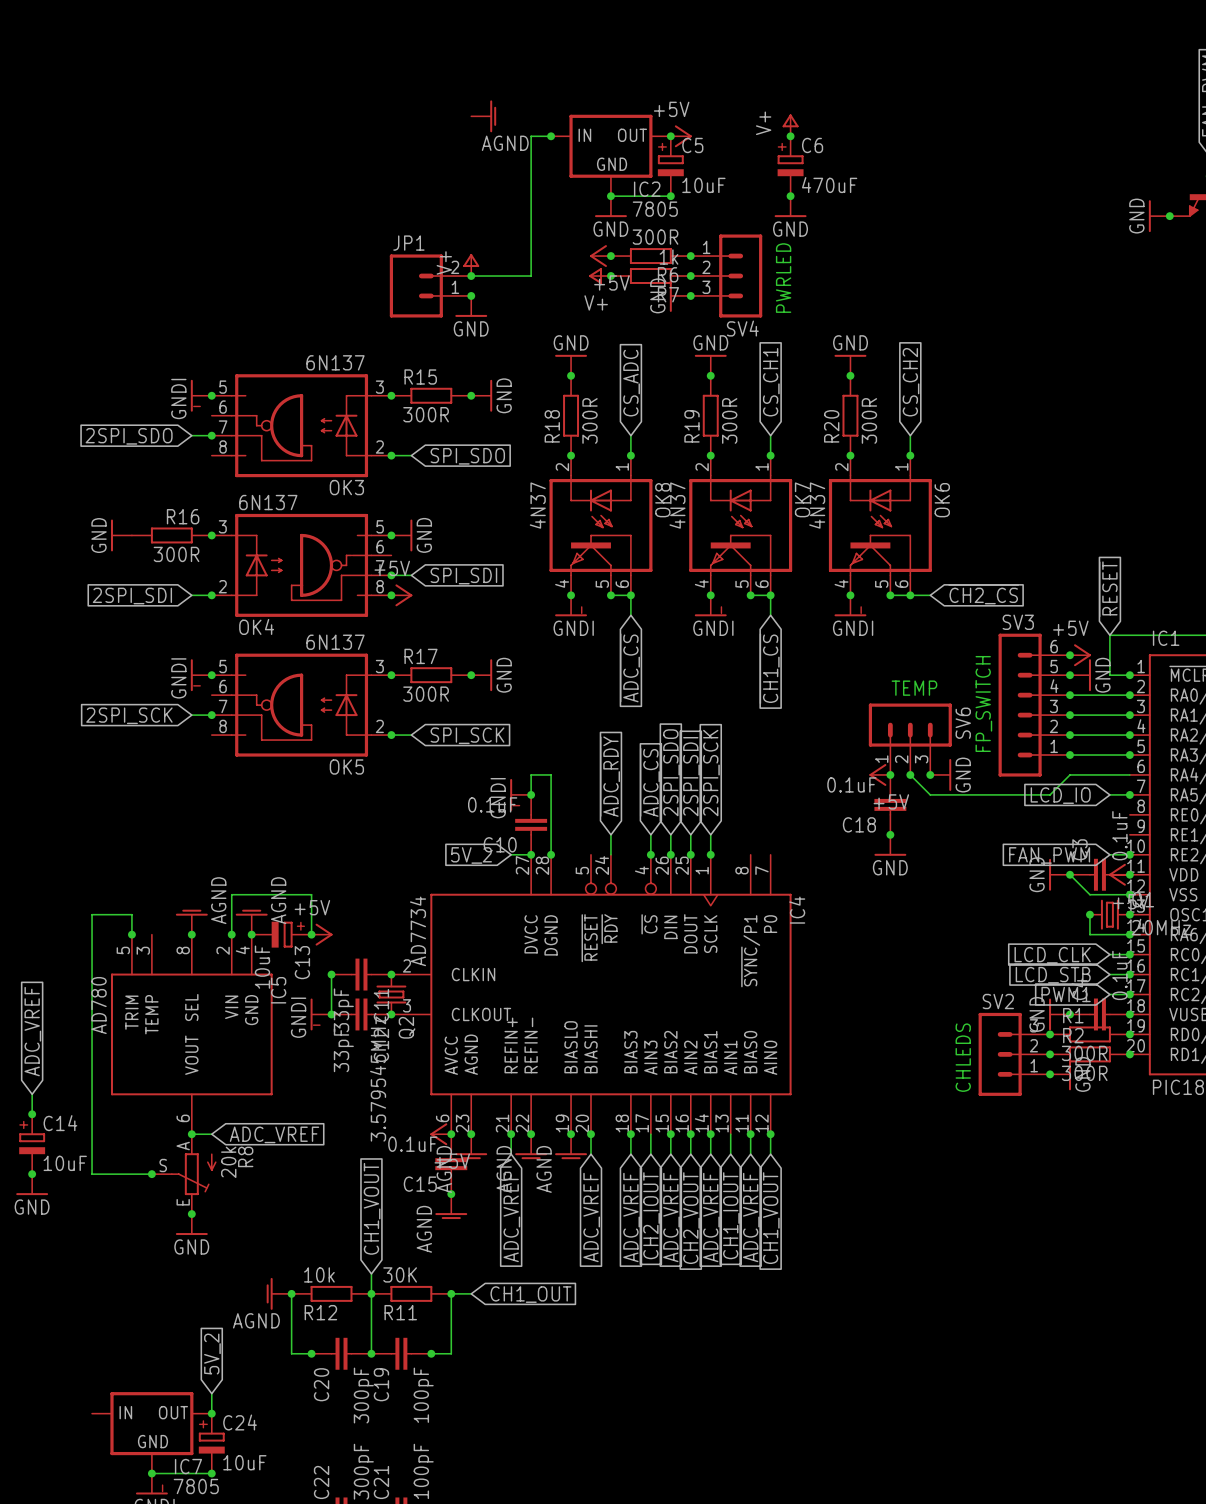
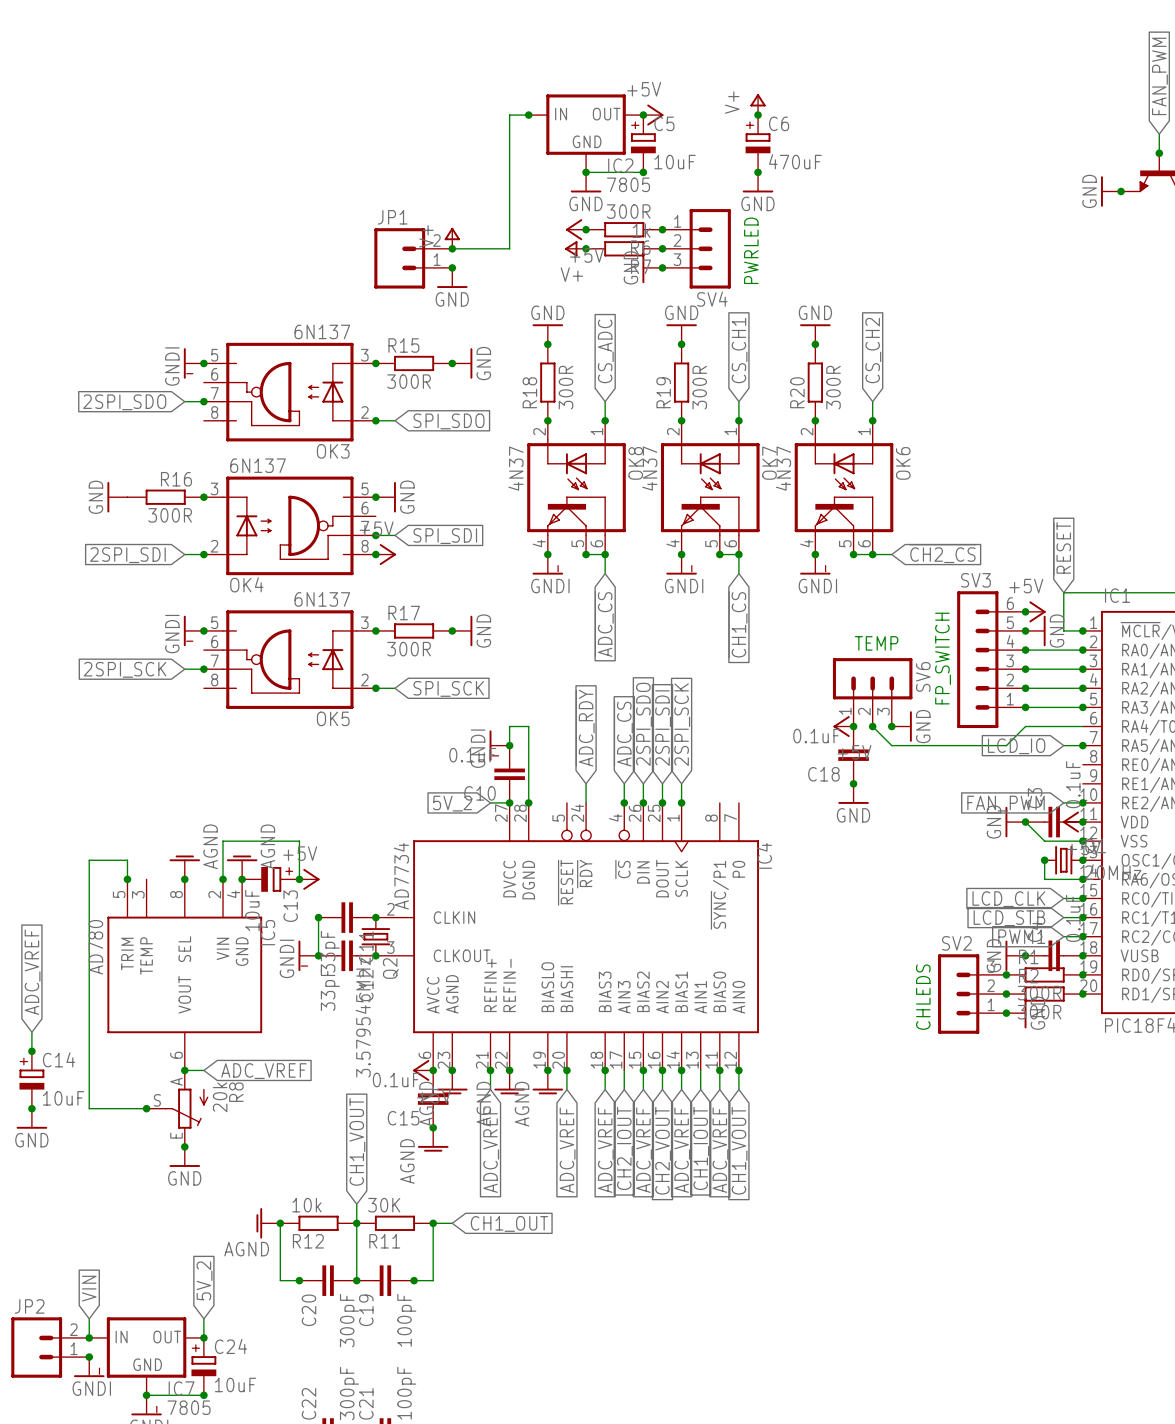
power symbol: AGND (483, 116) -> none
global label: none -> VIN (89, 1288)
wire: none -> (89, 1318) (89, 1337)
junction: none -> (89, 1337)
JP2: none -> (50, 1347)
junction: none -> (89, 1357)
power symbol: none -> GNDI (89, 1367)

